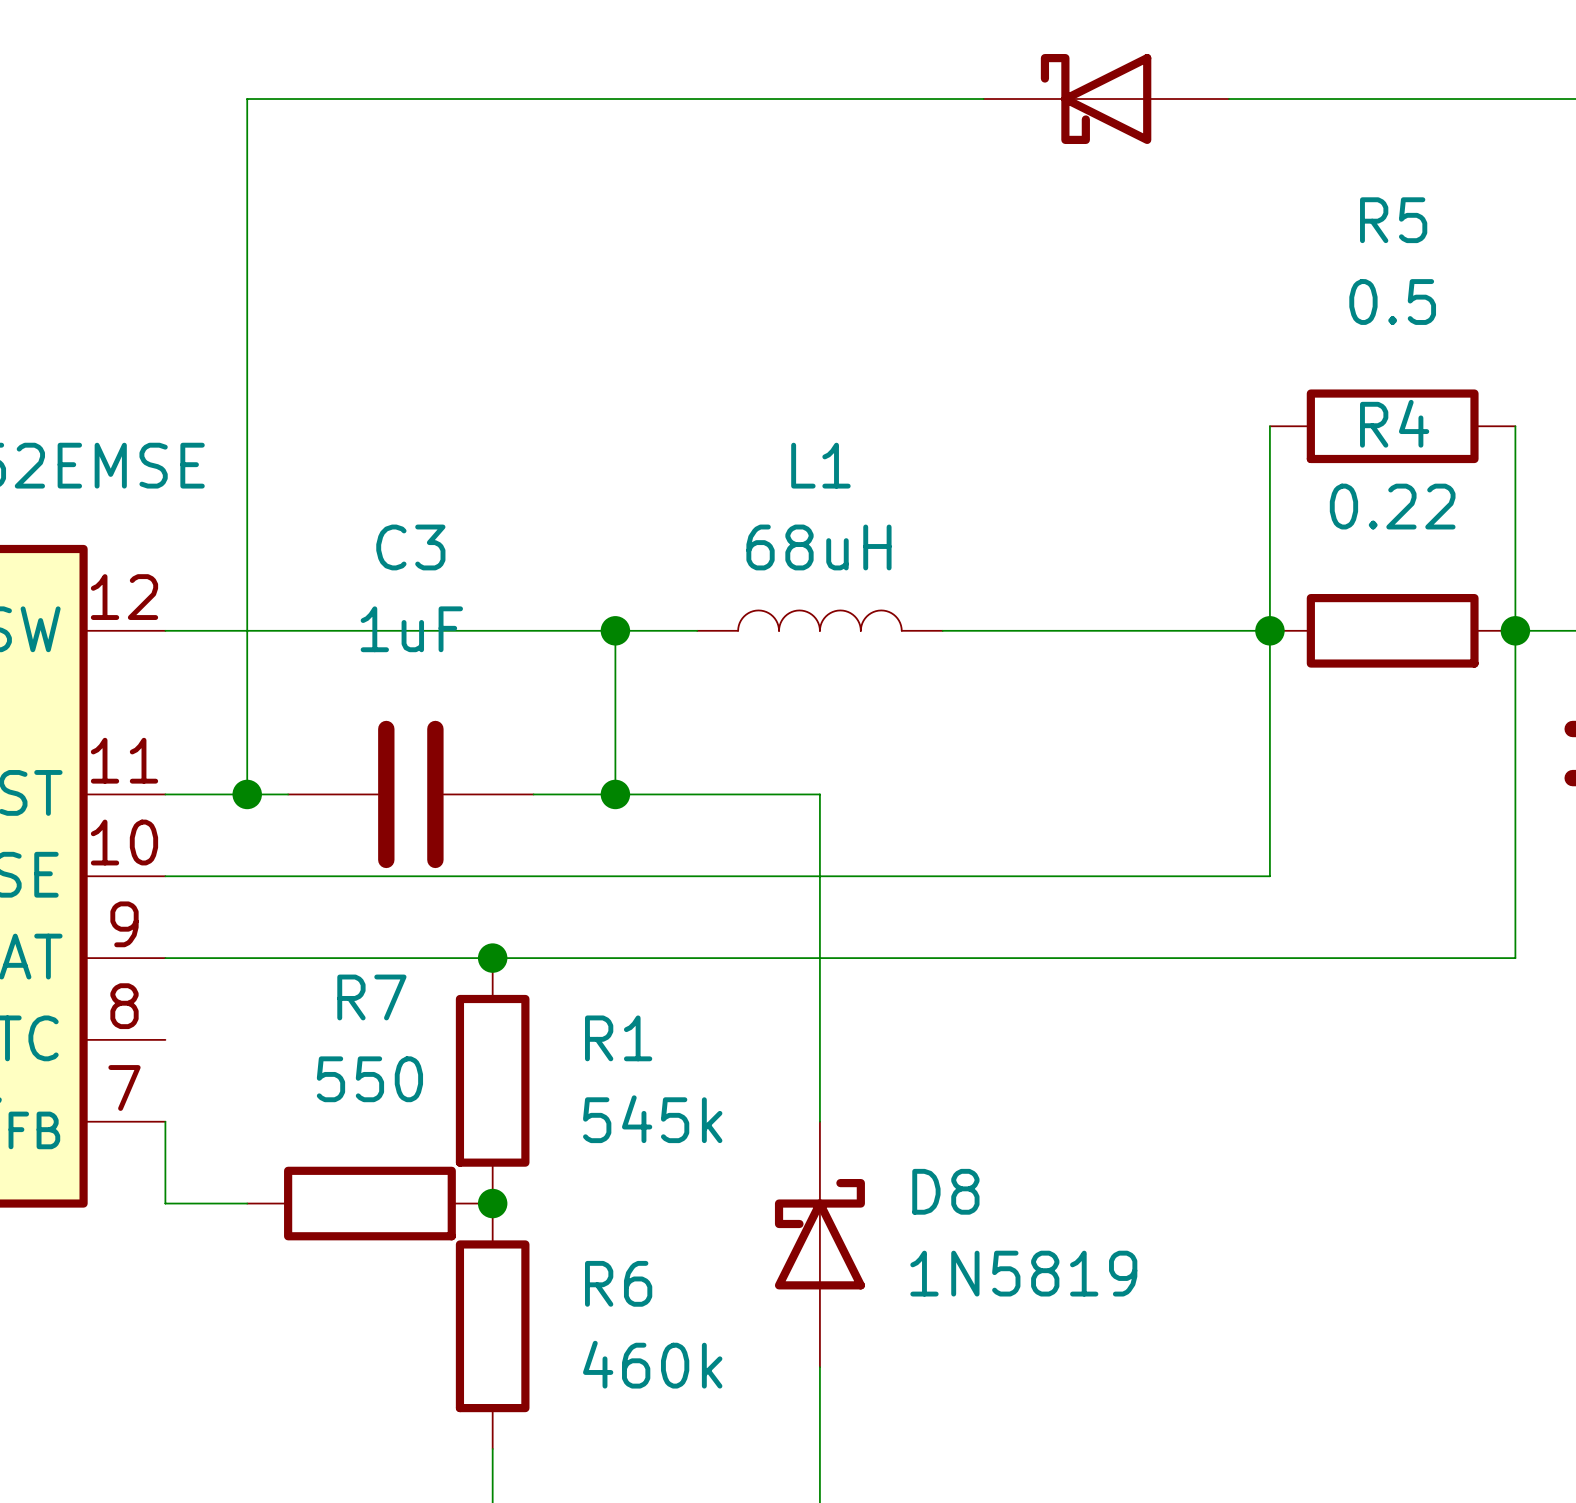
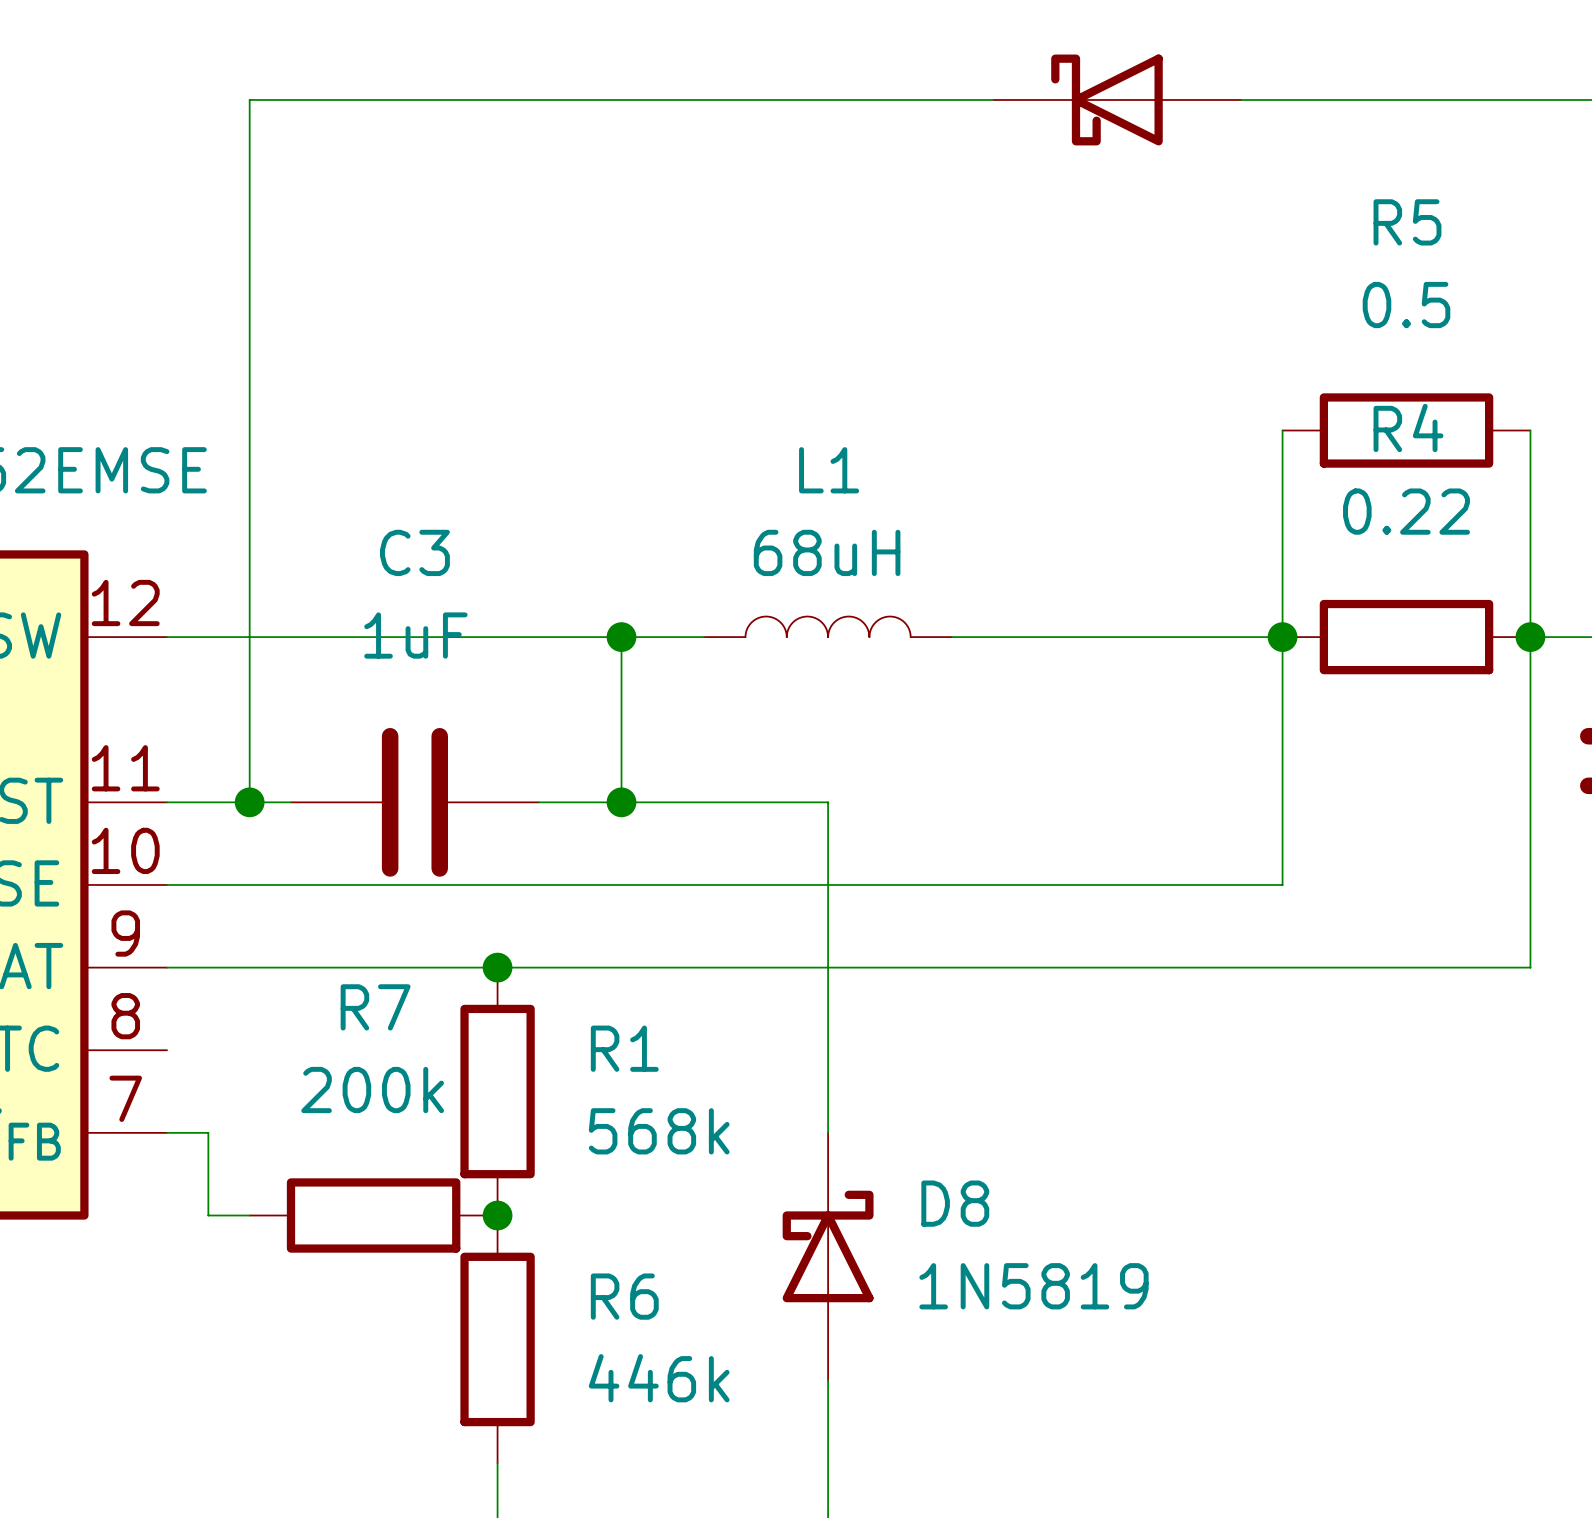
R7 value: 550 (369, 1079) -> 200k (372, 1090)
R1 value: 545k (652, 1119) -> 568k (659, 1131)
wire: (165, 1121) (165, 1203) (206, 1203) -> (167, 1132) (208, 1132) (208, 1215)
R6 value: 460k (652, 1364) -> 446k (659, 1378)

